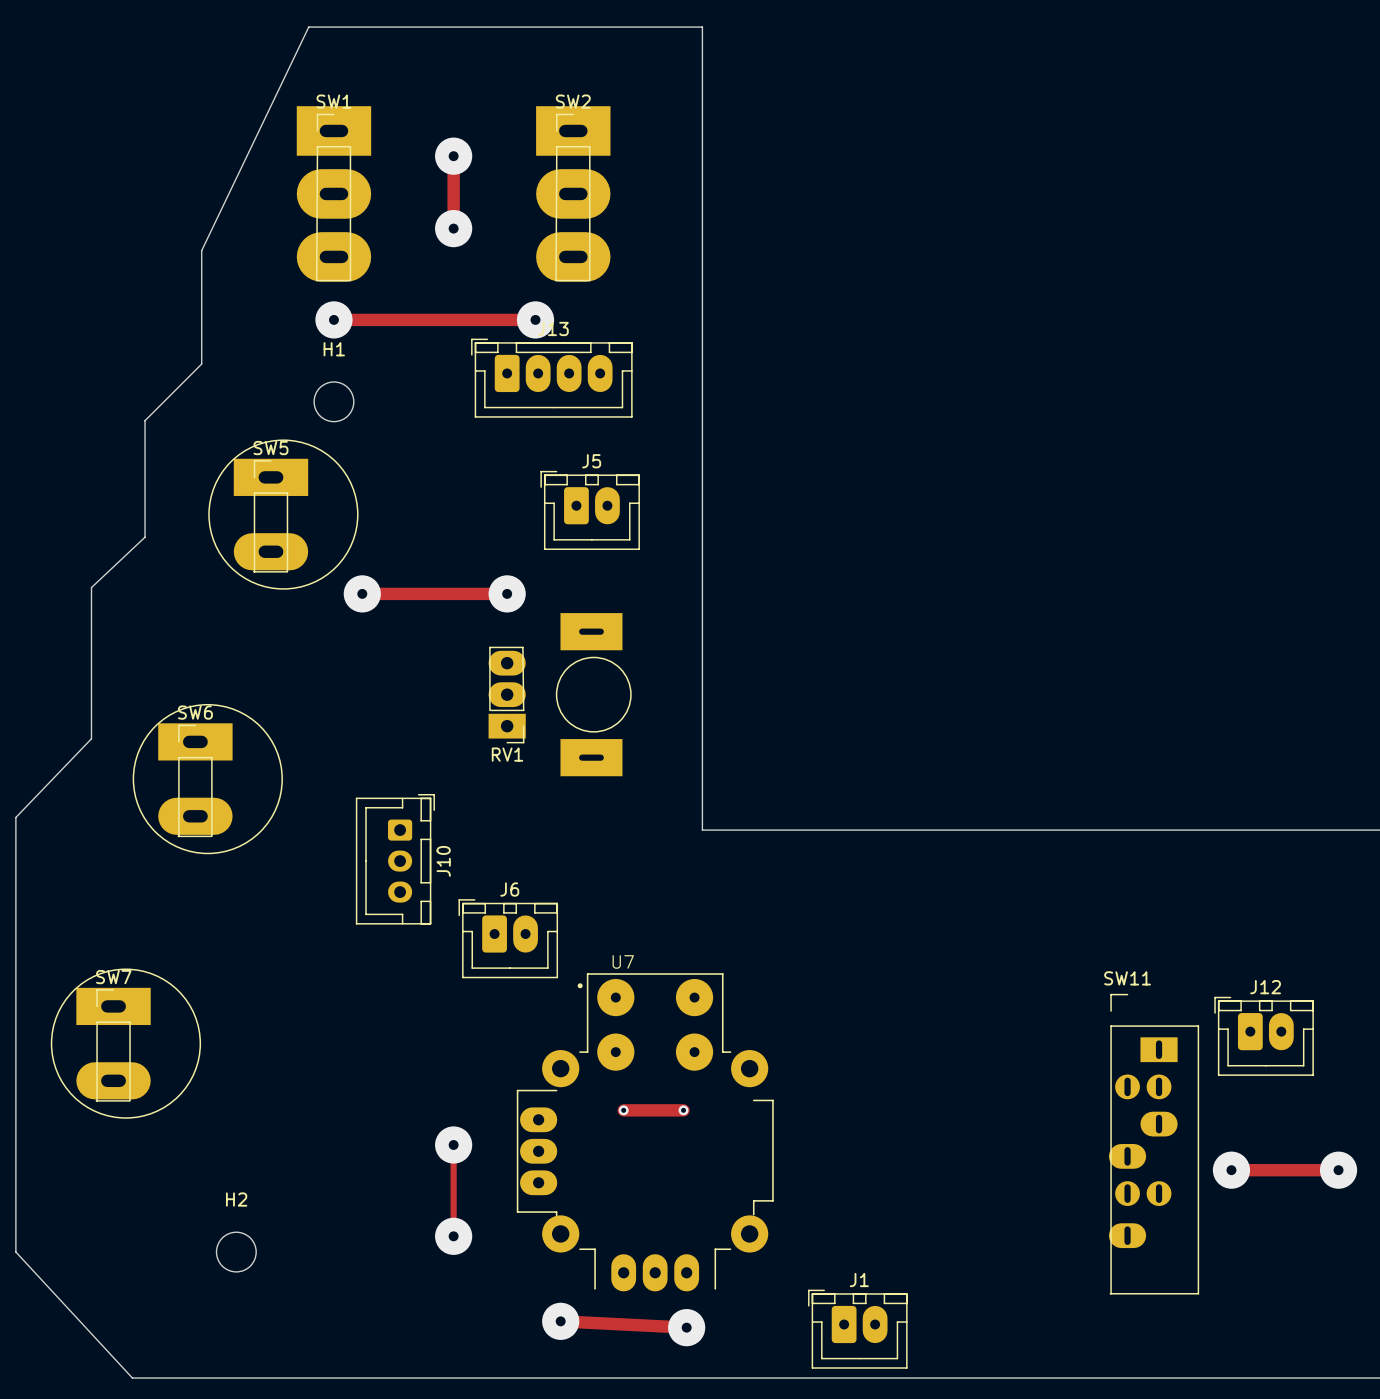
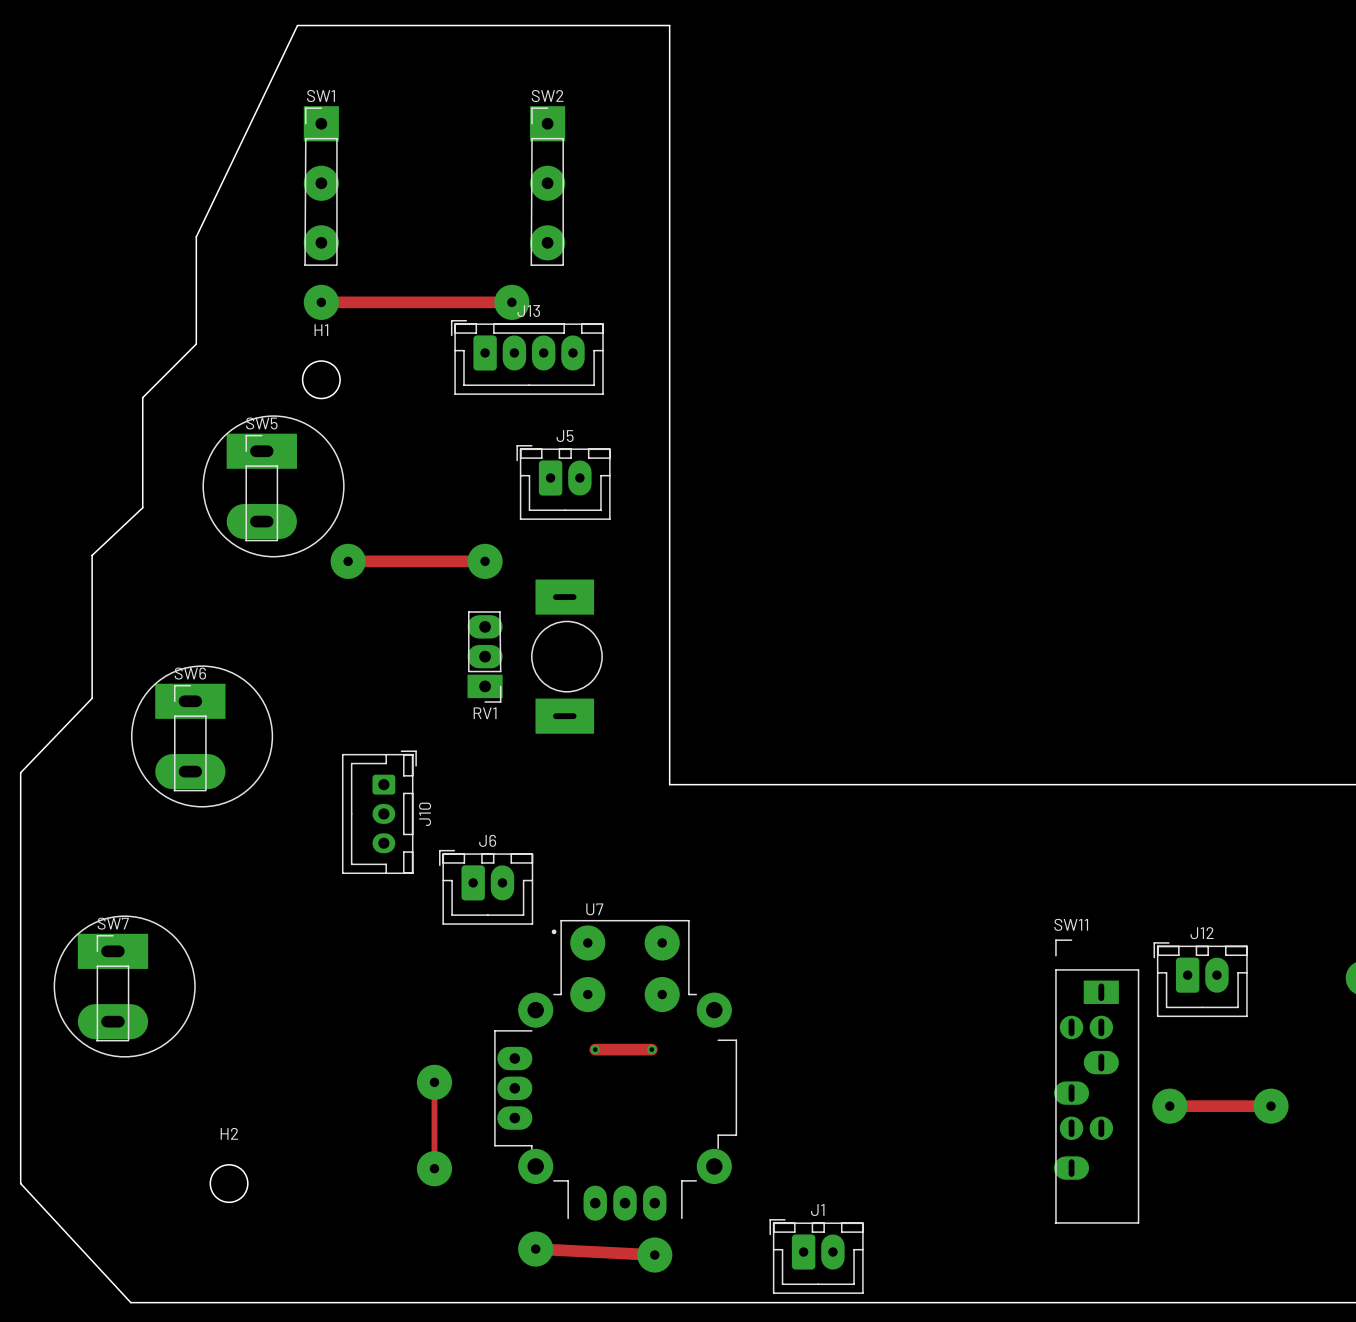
SW1 footprint: [296, 106, 372, 282] -> [303, 106, 339, 266]
SW2 footprint: [536, 106, 611, 282] -> [530, 106, 566, 266]
track: (453, 156) (453, 228) -> none
via: (453, 156) -> none
via: (453, 228) -> none

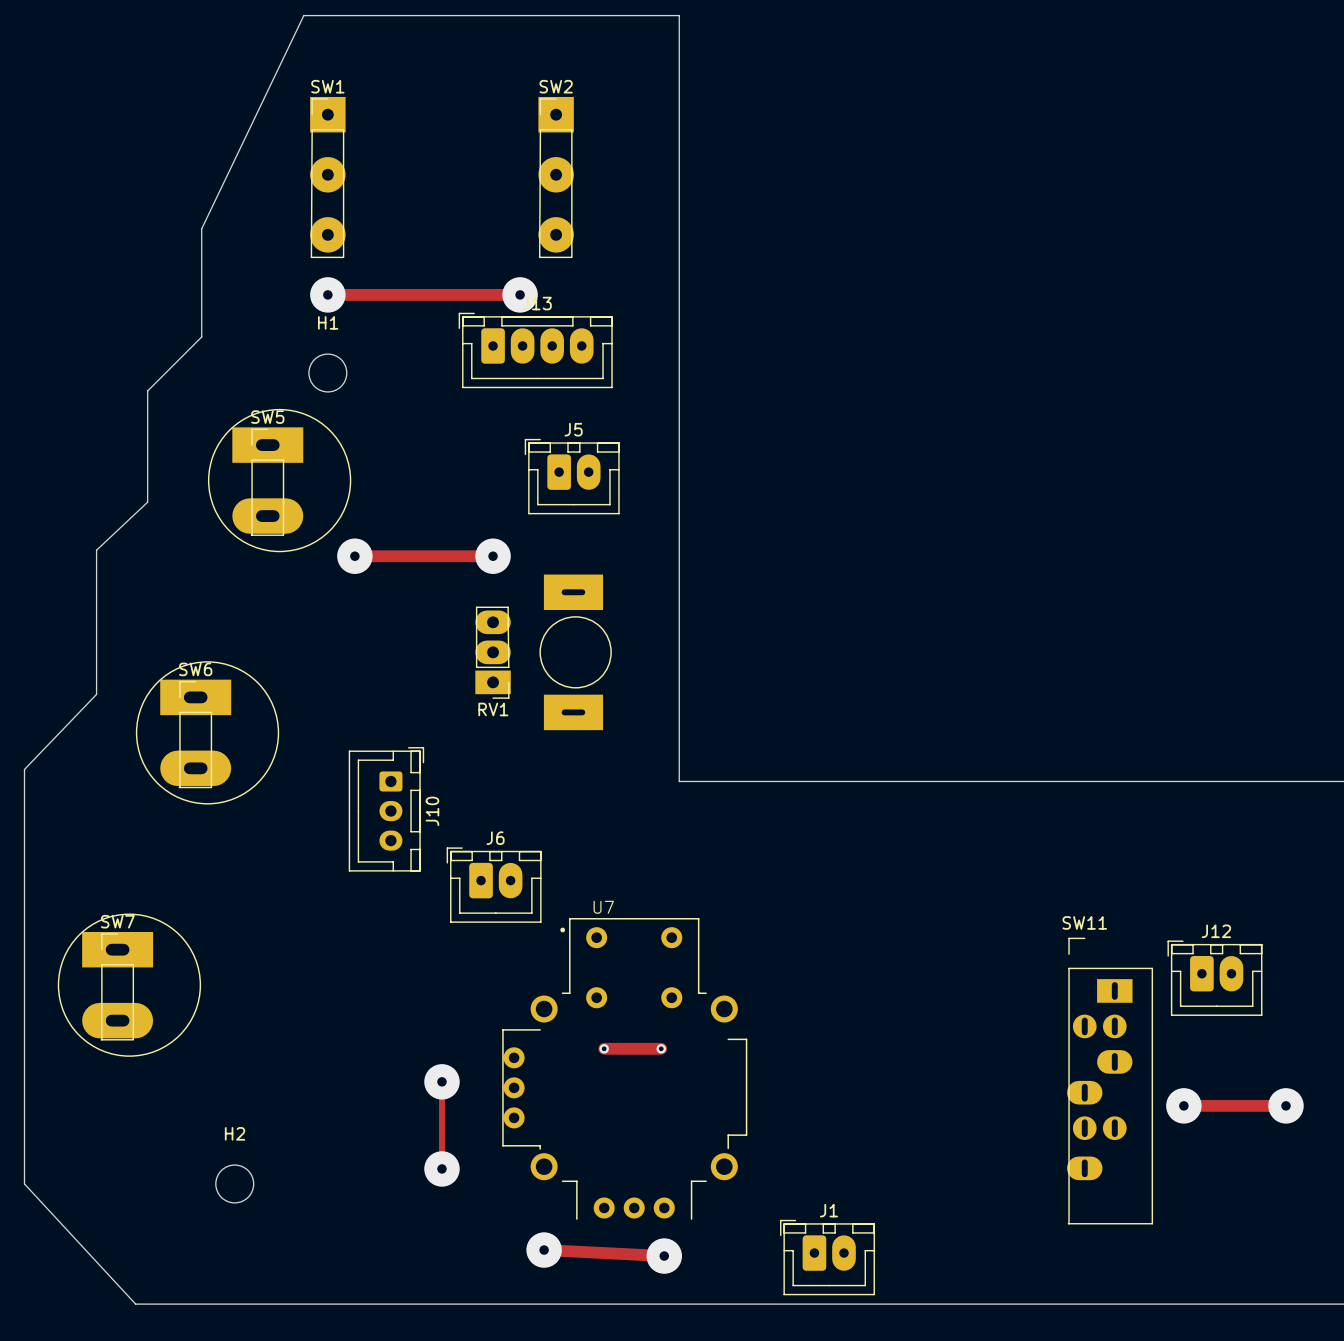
U7 footprint: [494, 919, 738, 1221] -> [502, 918, 748, 1220]

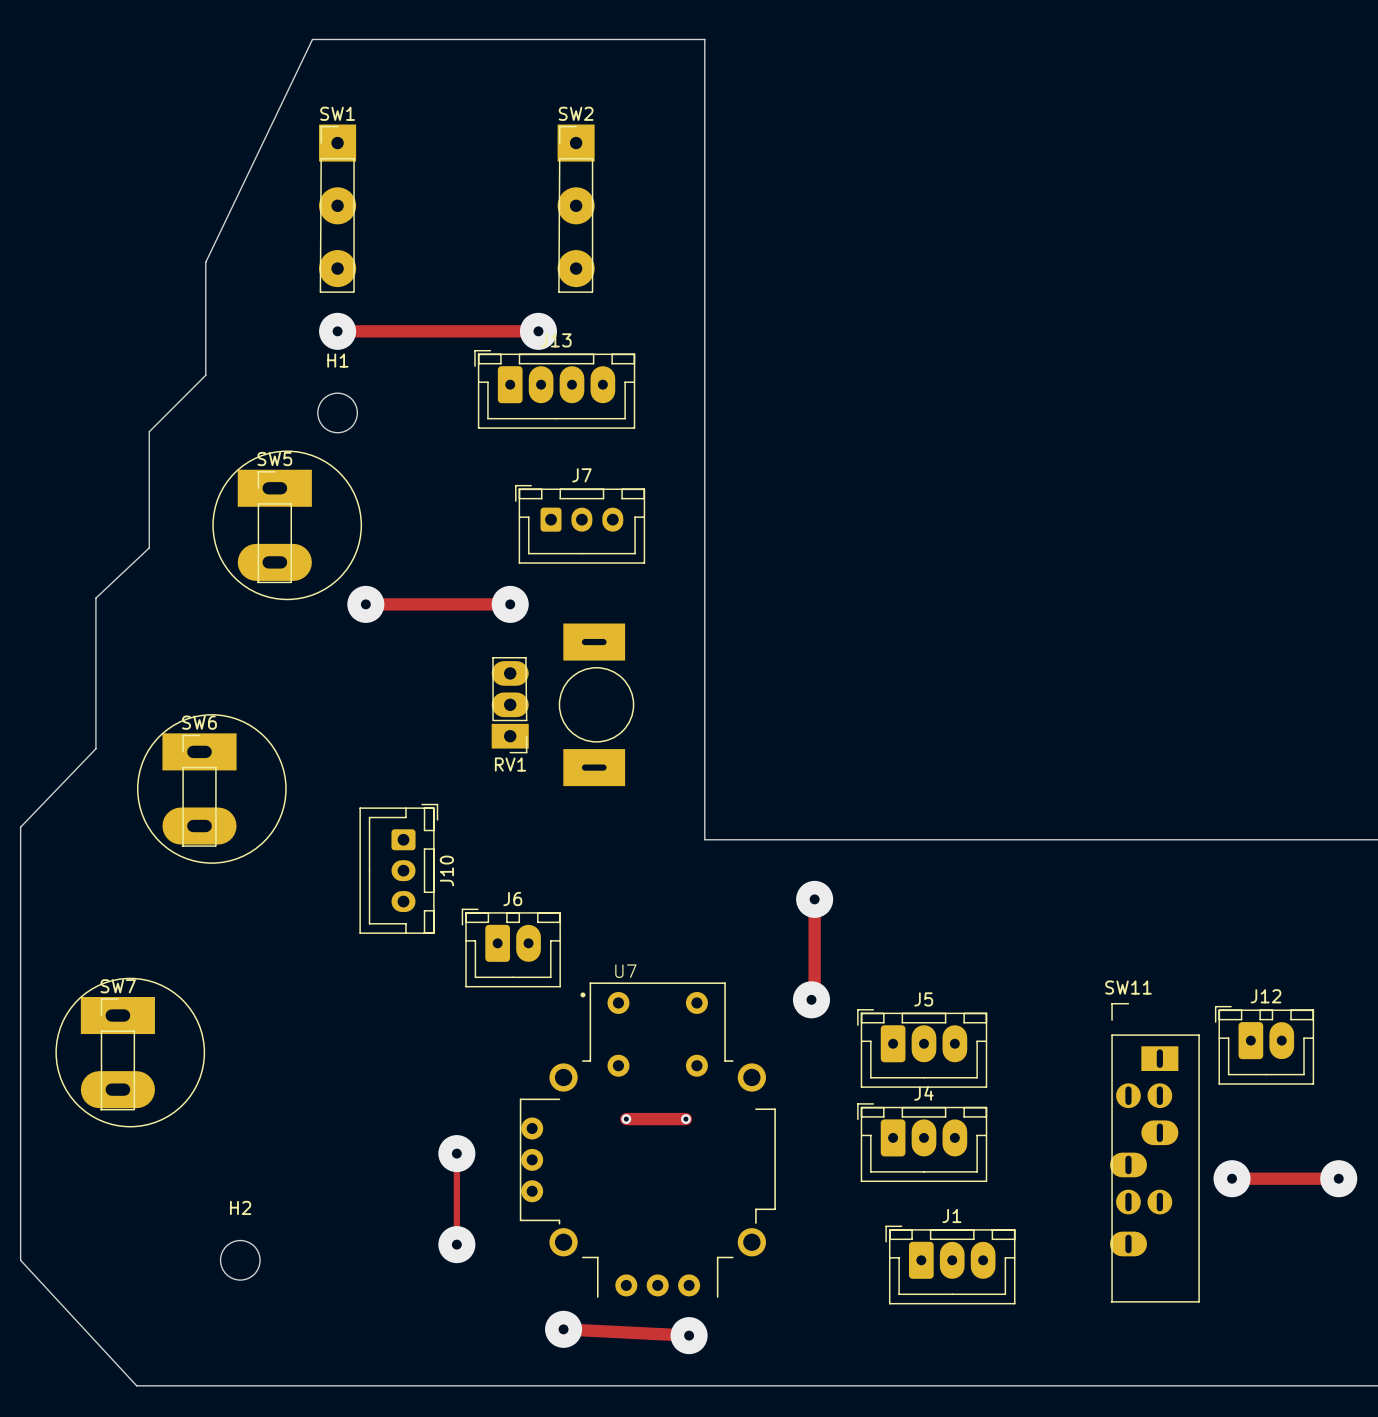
J5 footprint: [524, 438, 620, 515] -> [857, 1009, 988, 1088]
J7: none -> (580, 524)
track: none -> (814, 899) (814, 996) (811, 999)
via: none -> (814, 899)
via: none -> (811, 999)
J4: none -> (922, 1142)
J1 footprint: [780, 1219, 875, 1296] -> [885, 1225, 1016, 1305]

